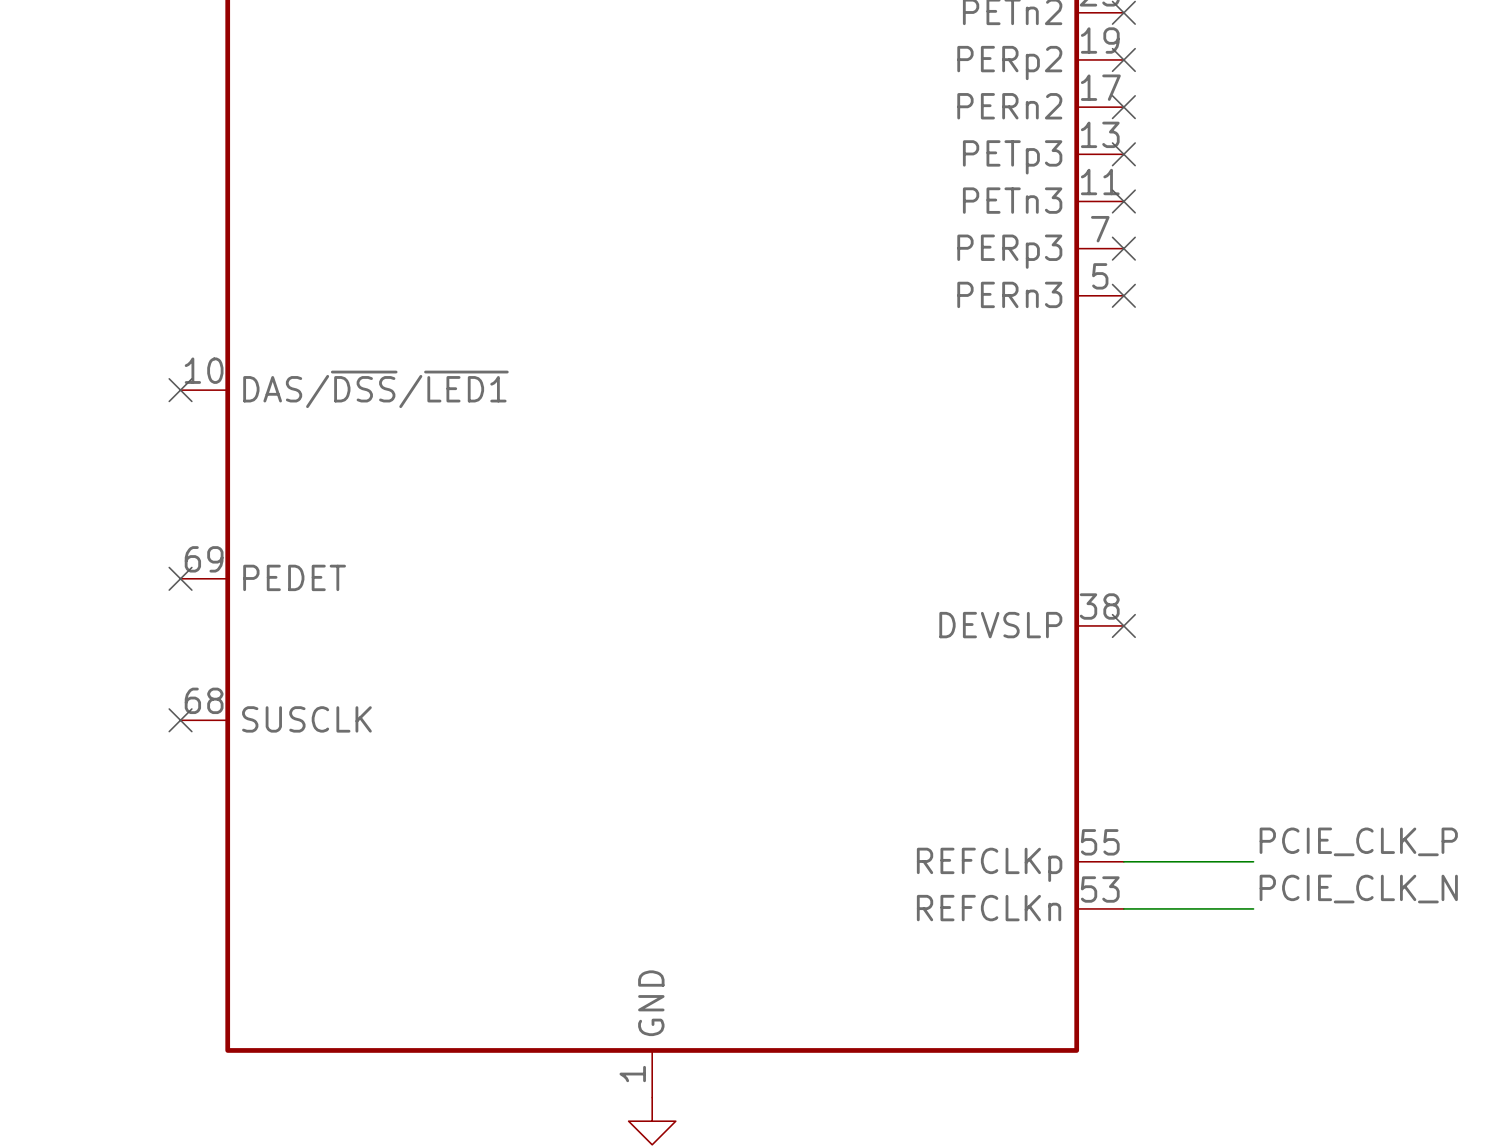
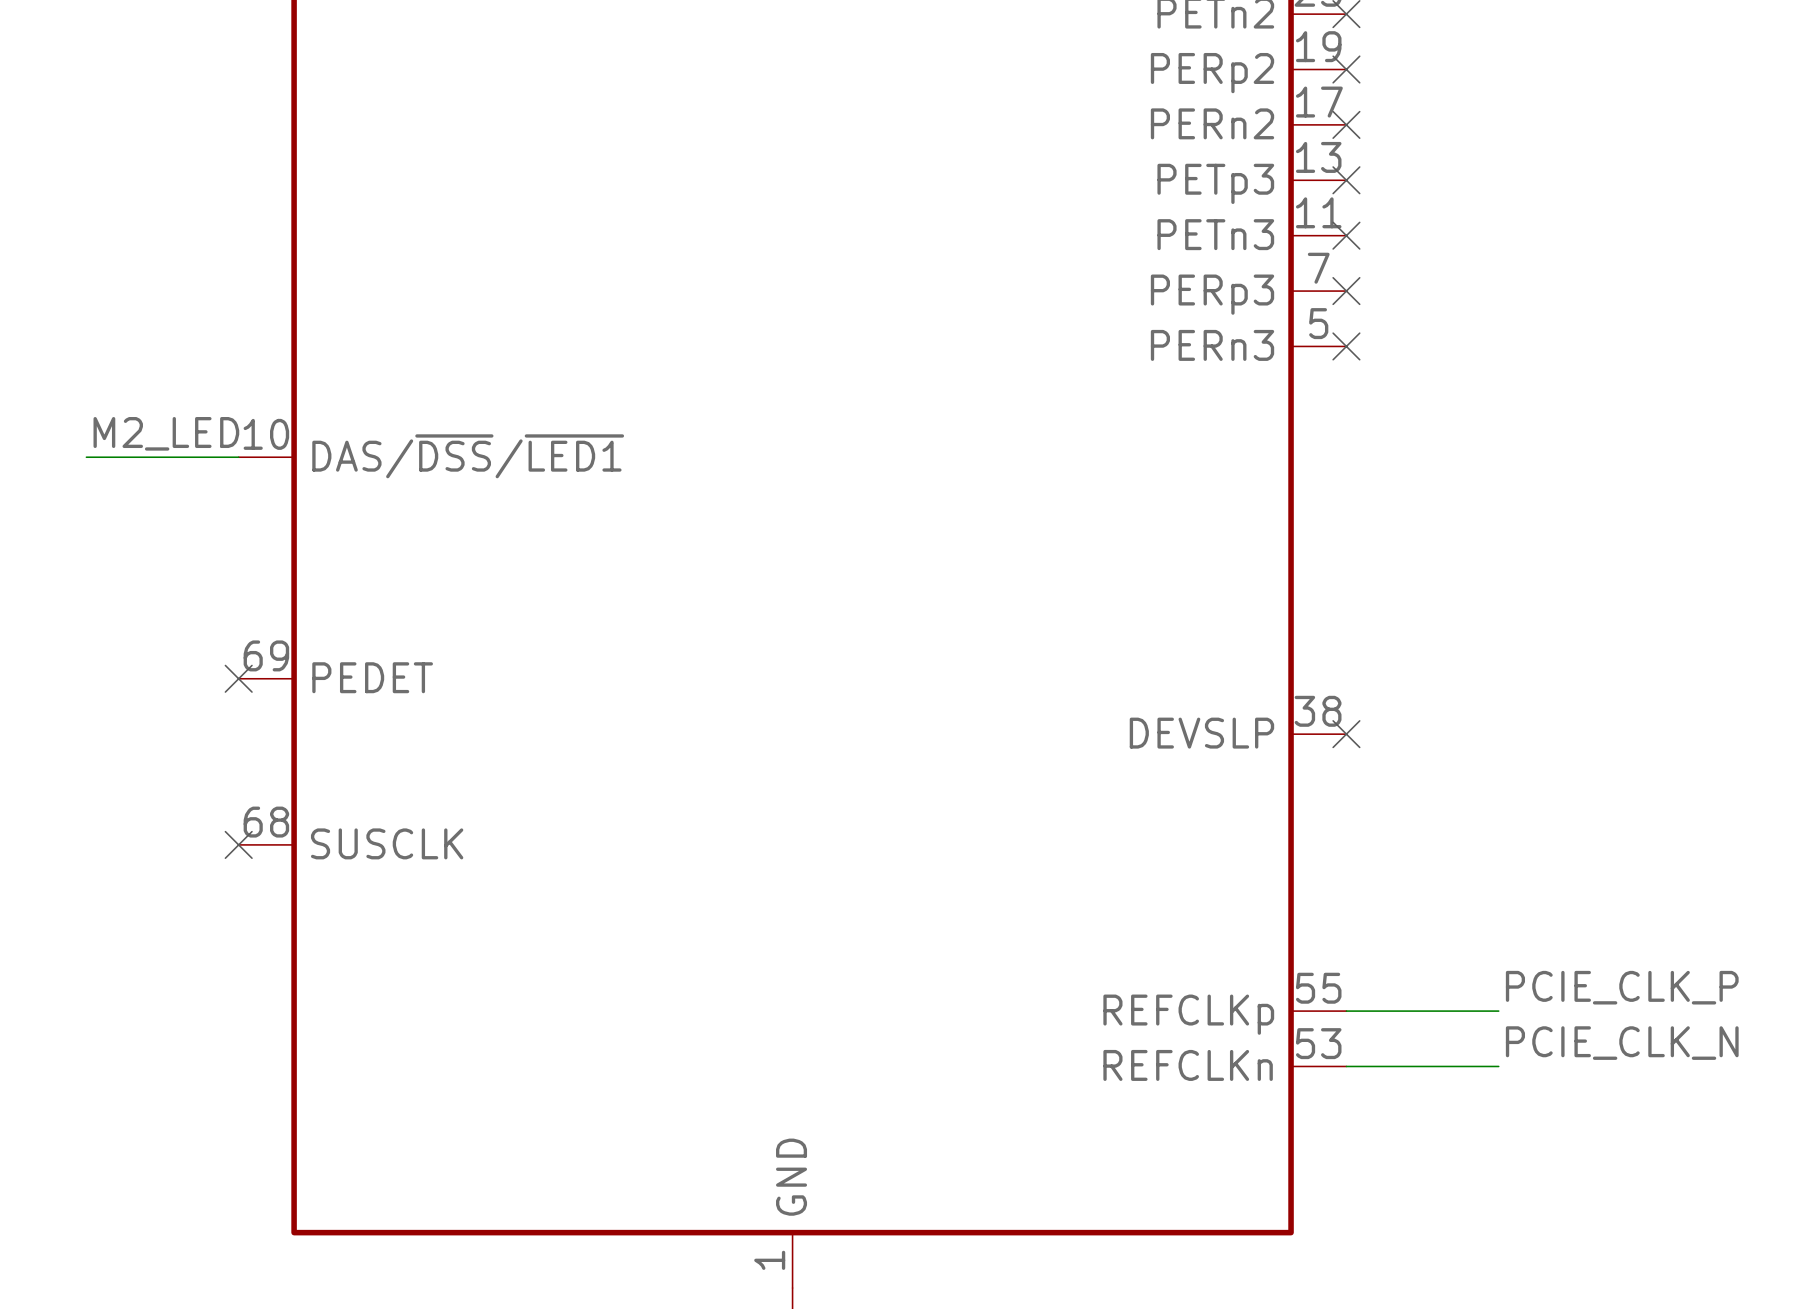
label: none -> M2_LED (166, 433)
wire: none -> (86, 457) (238, 457)
no-connect mark: (180, 390) -> none

